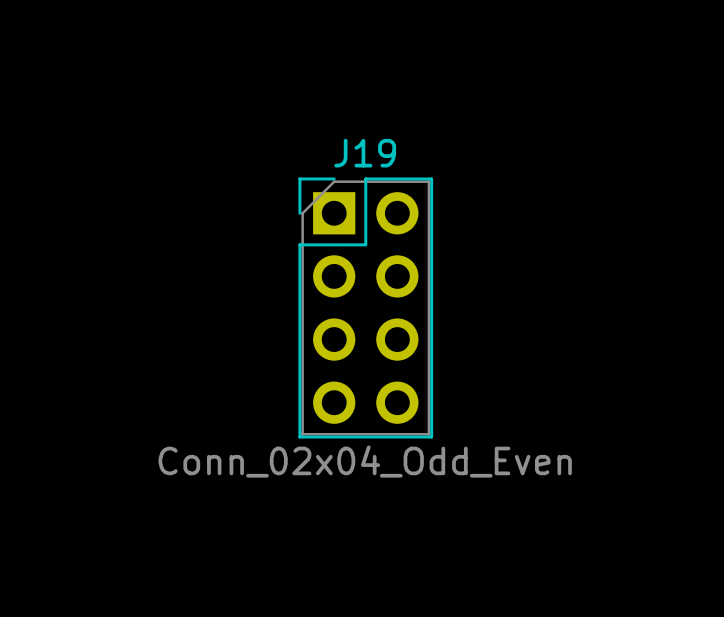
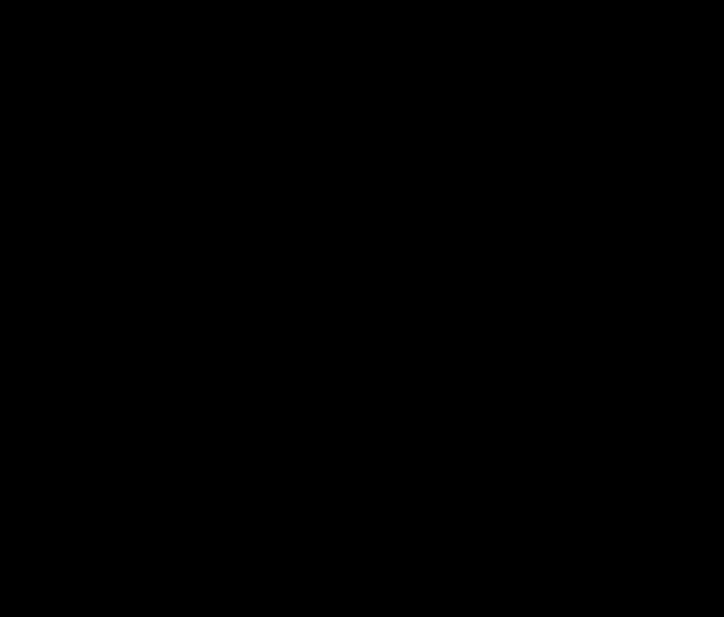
J19: Conn_02x04_Odd_Even (365, 307) -> none

